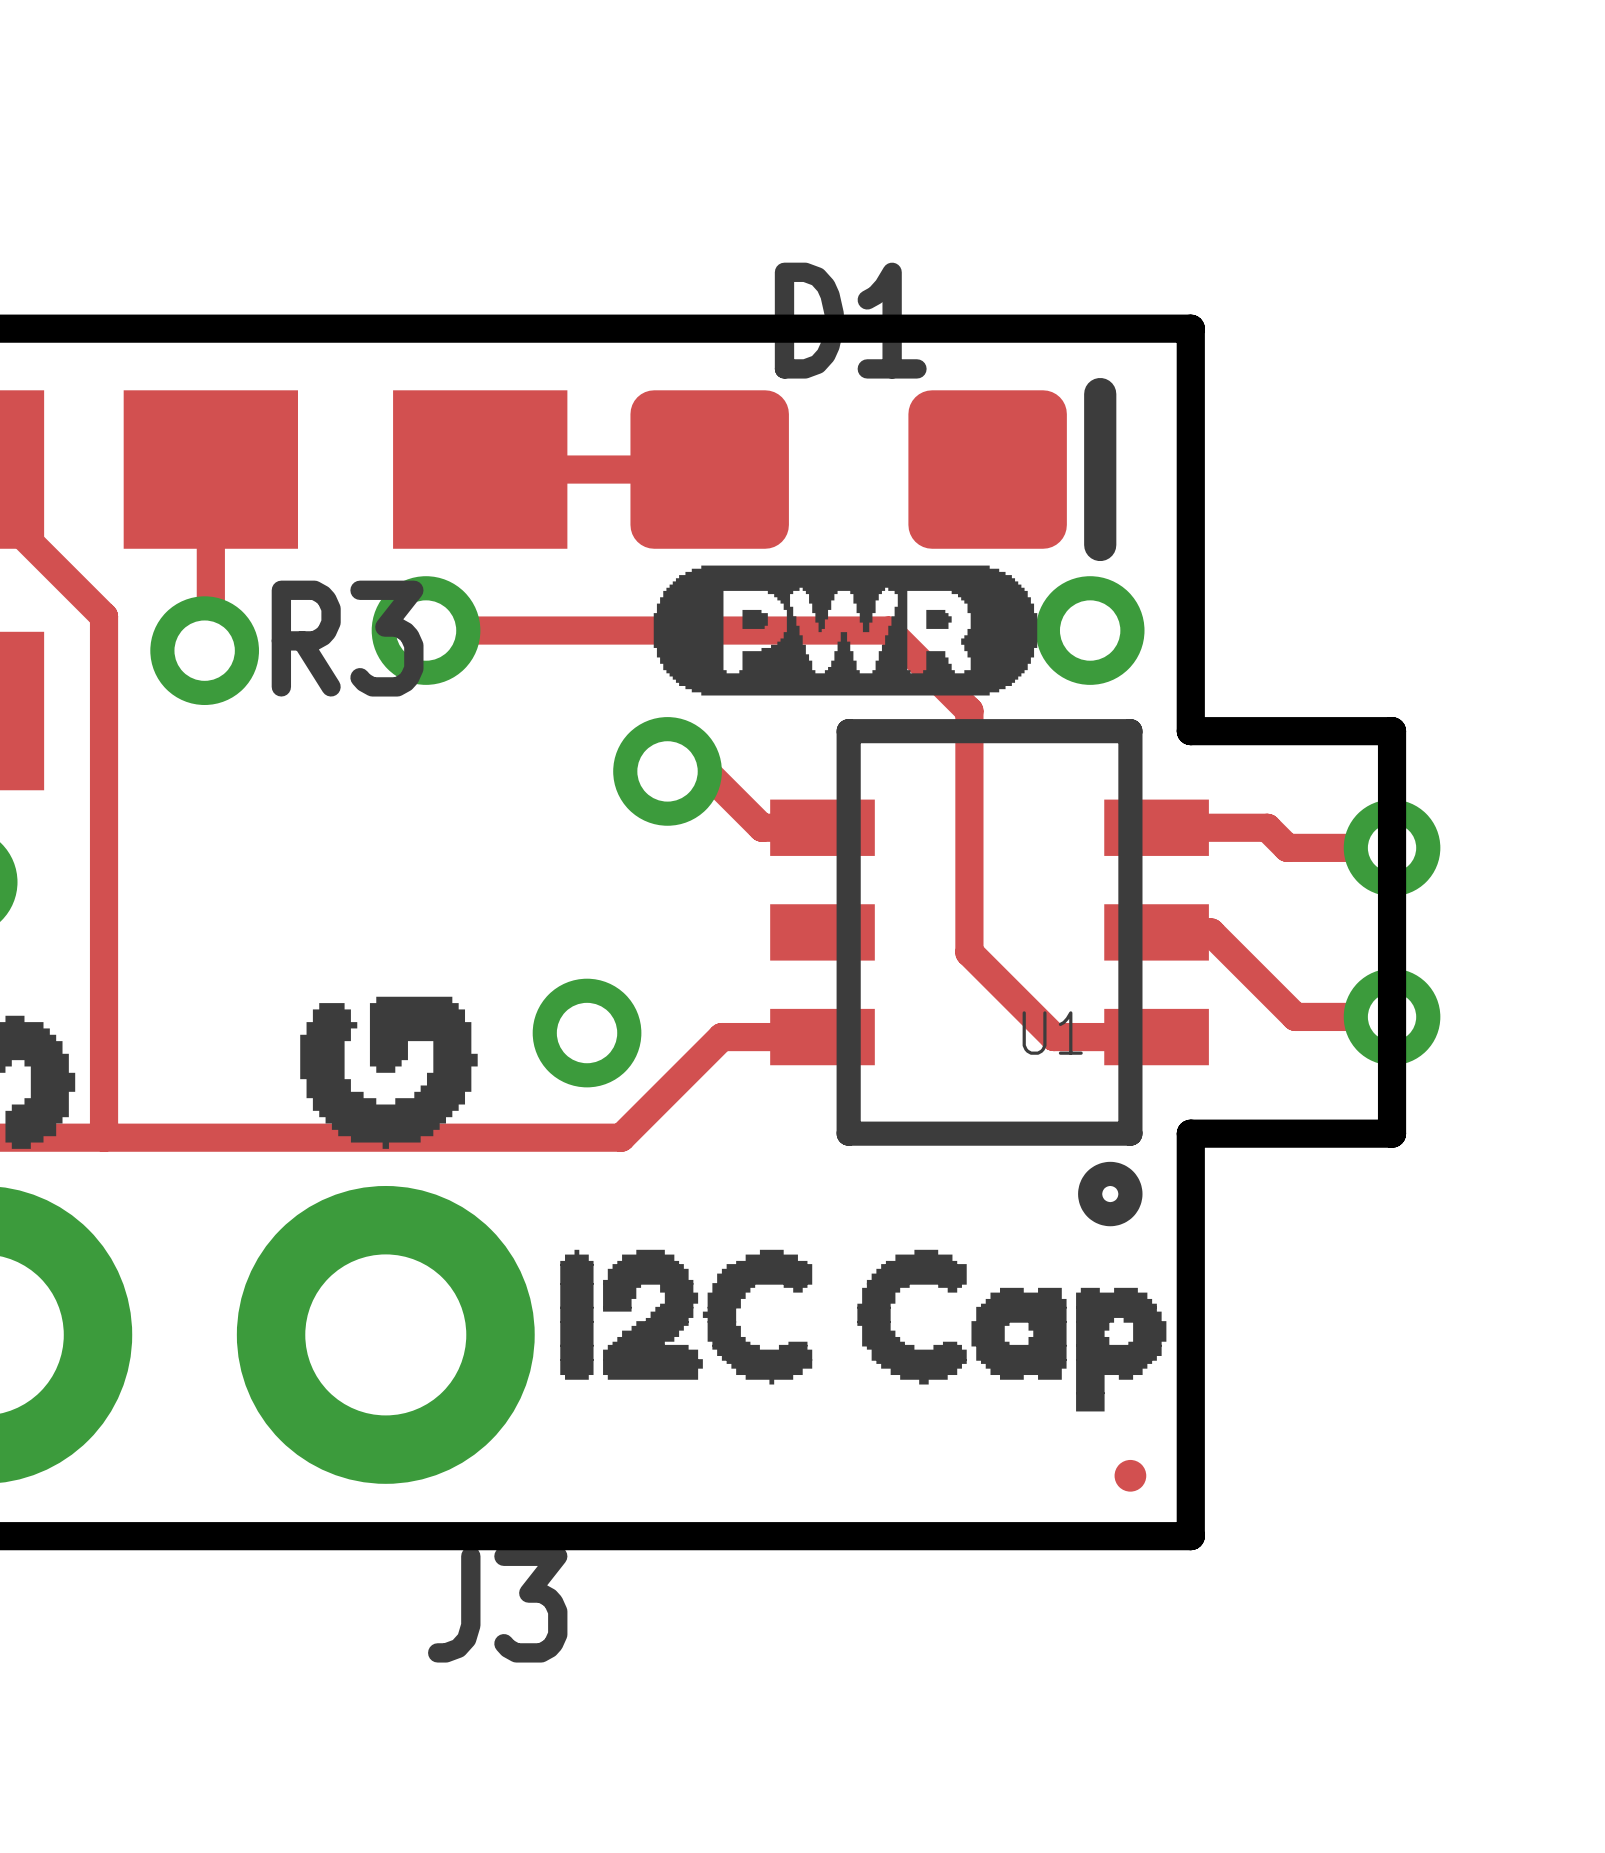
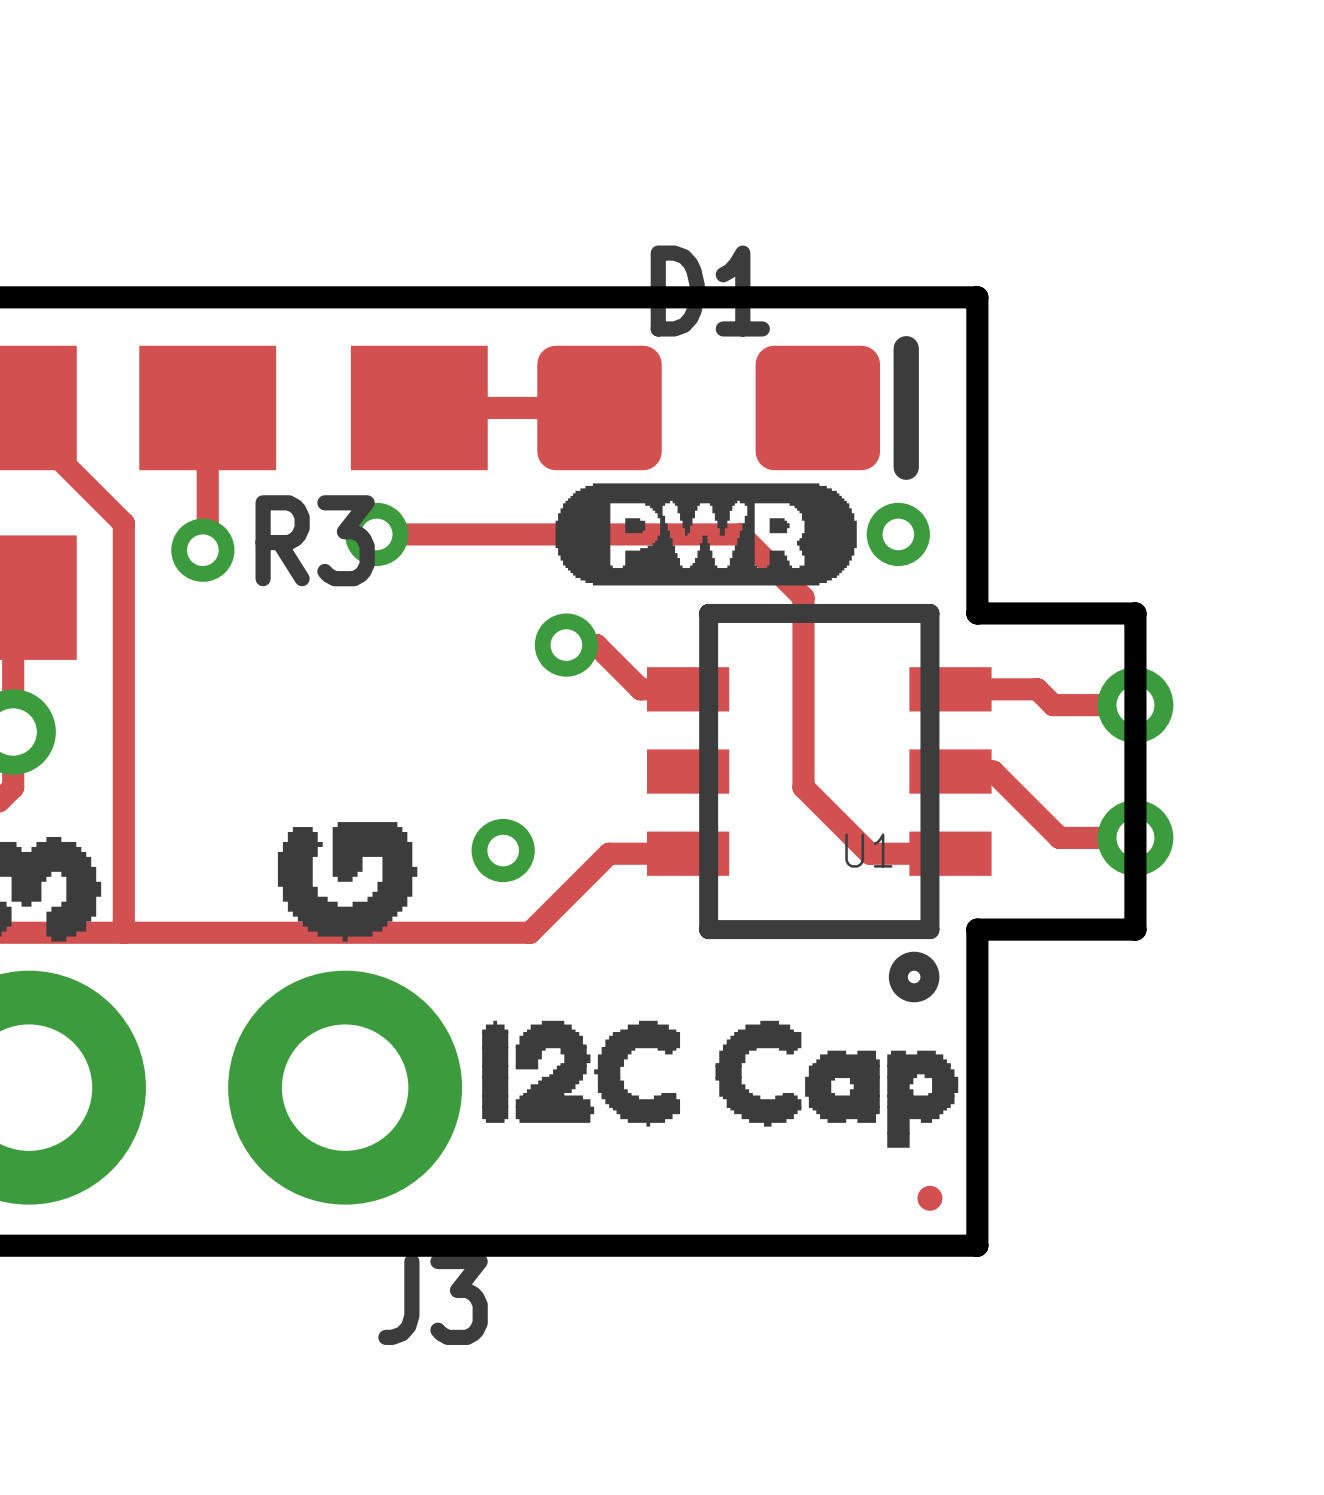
via size: [371, 576, 481, 685] -> [345, 502, 409, 567]
via size: [1035, 576, 1145, 685] -> [866, 502, 930, 567]
via size: [150, 596, 259, 706] -> [171, 518, 235, 582]
via size: [613, 717, 722, 826] -> [534, 613, 599, 677]
via size: [532, 978, 642, 1088] -> [471, 818, 535, 883]

